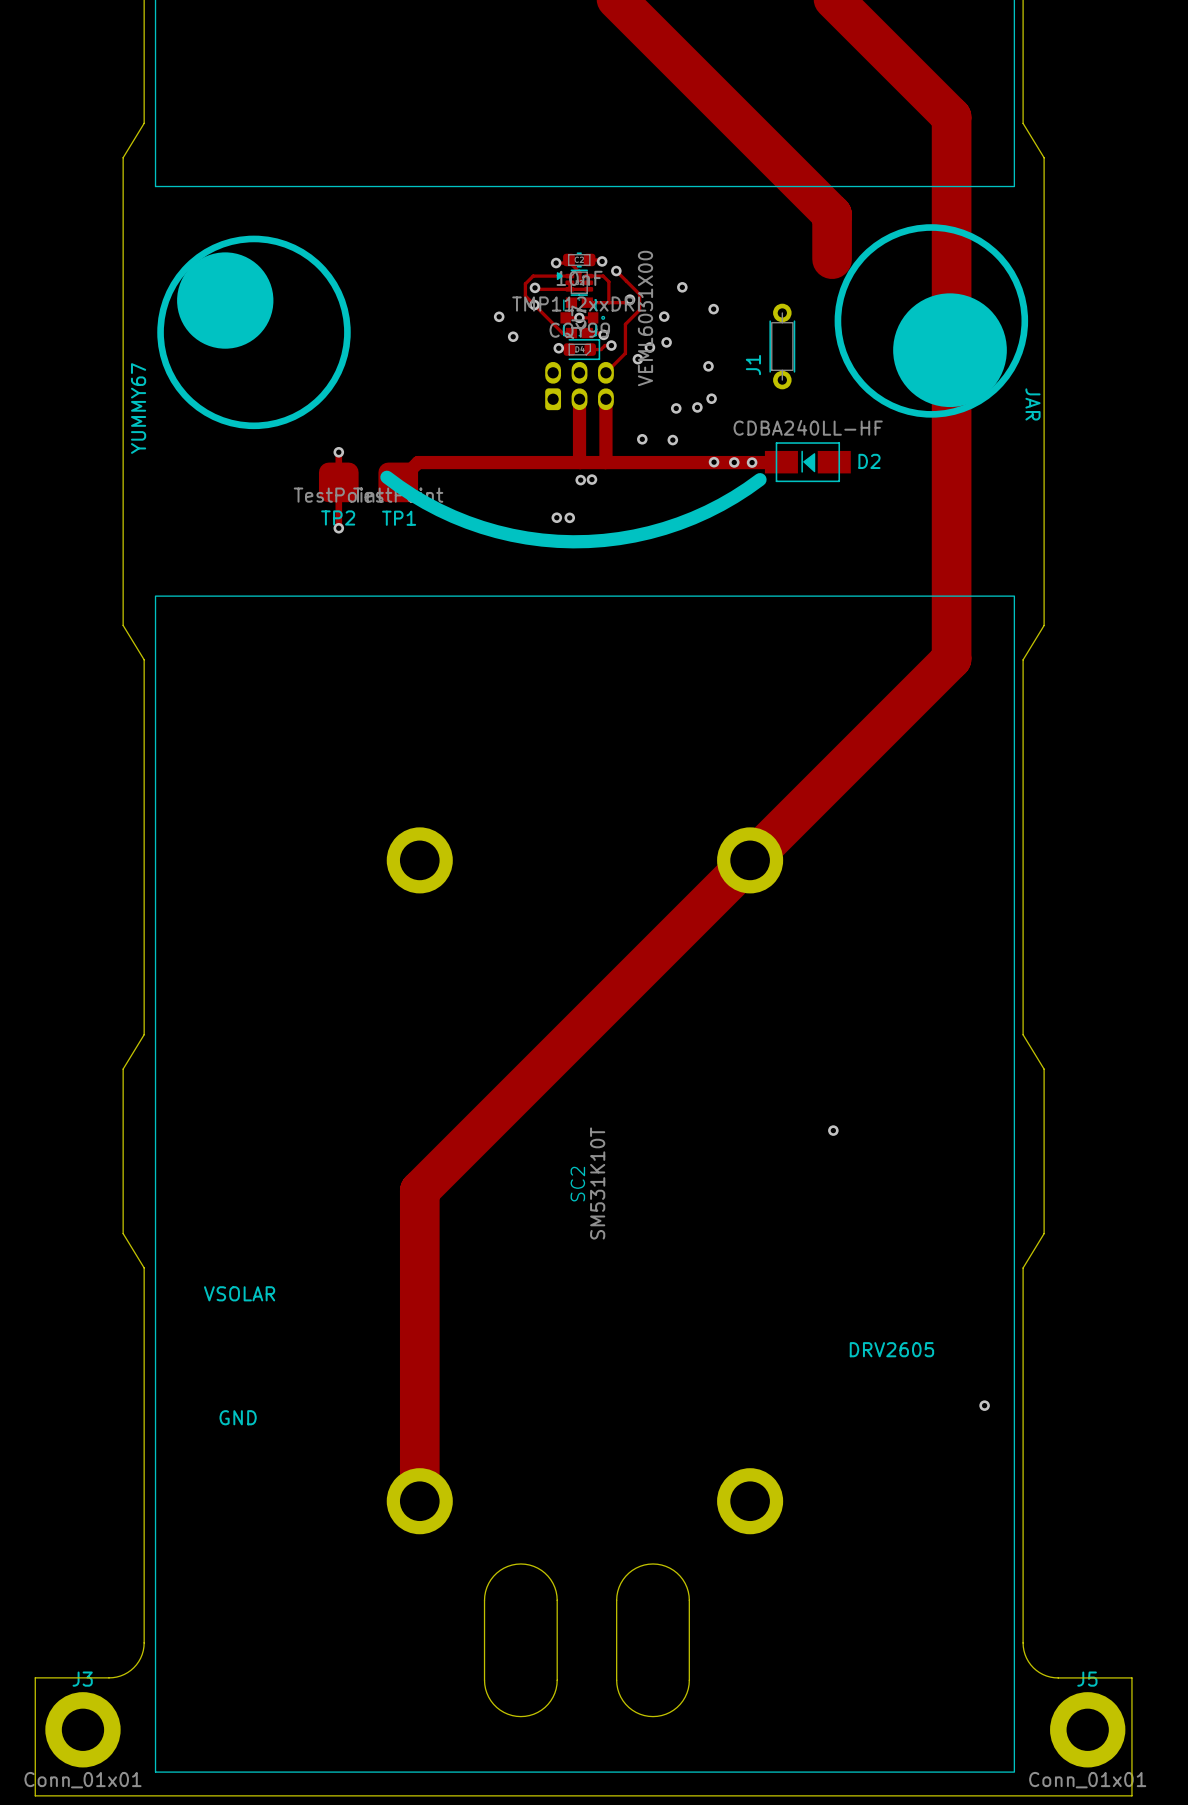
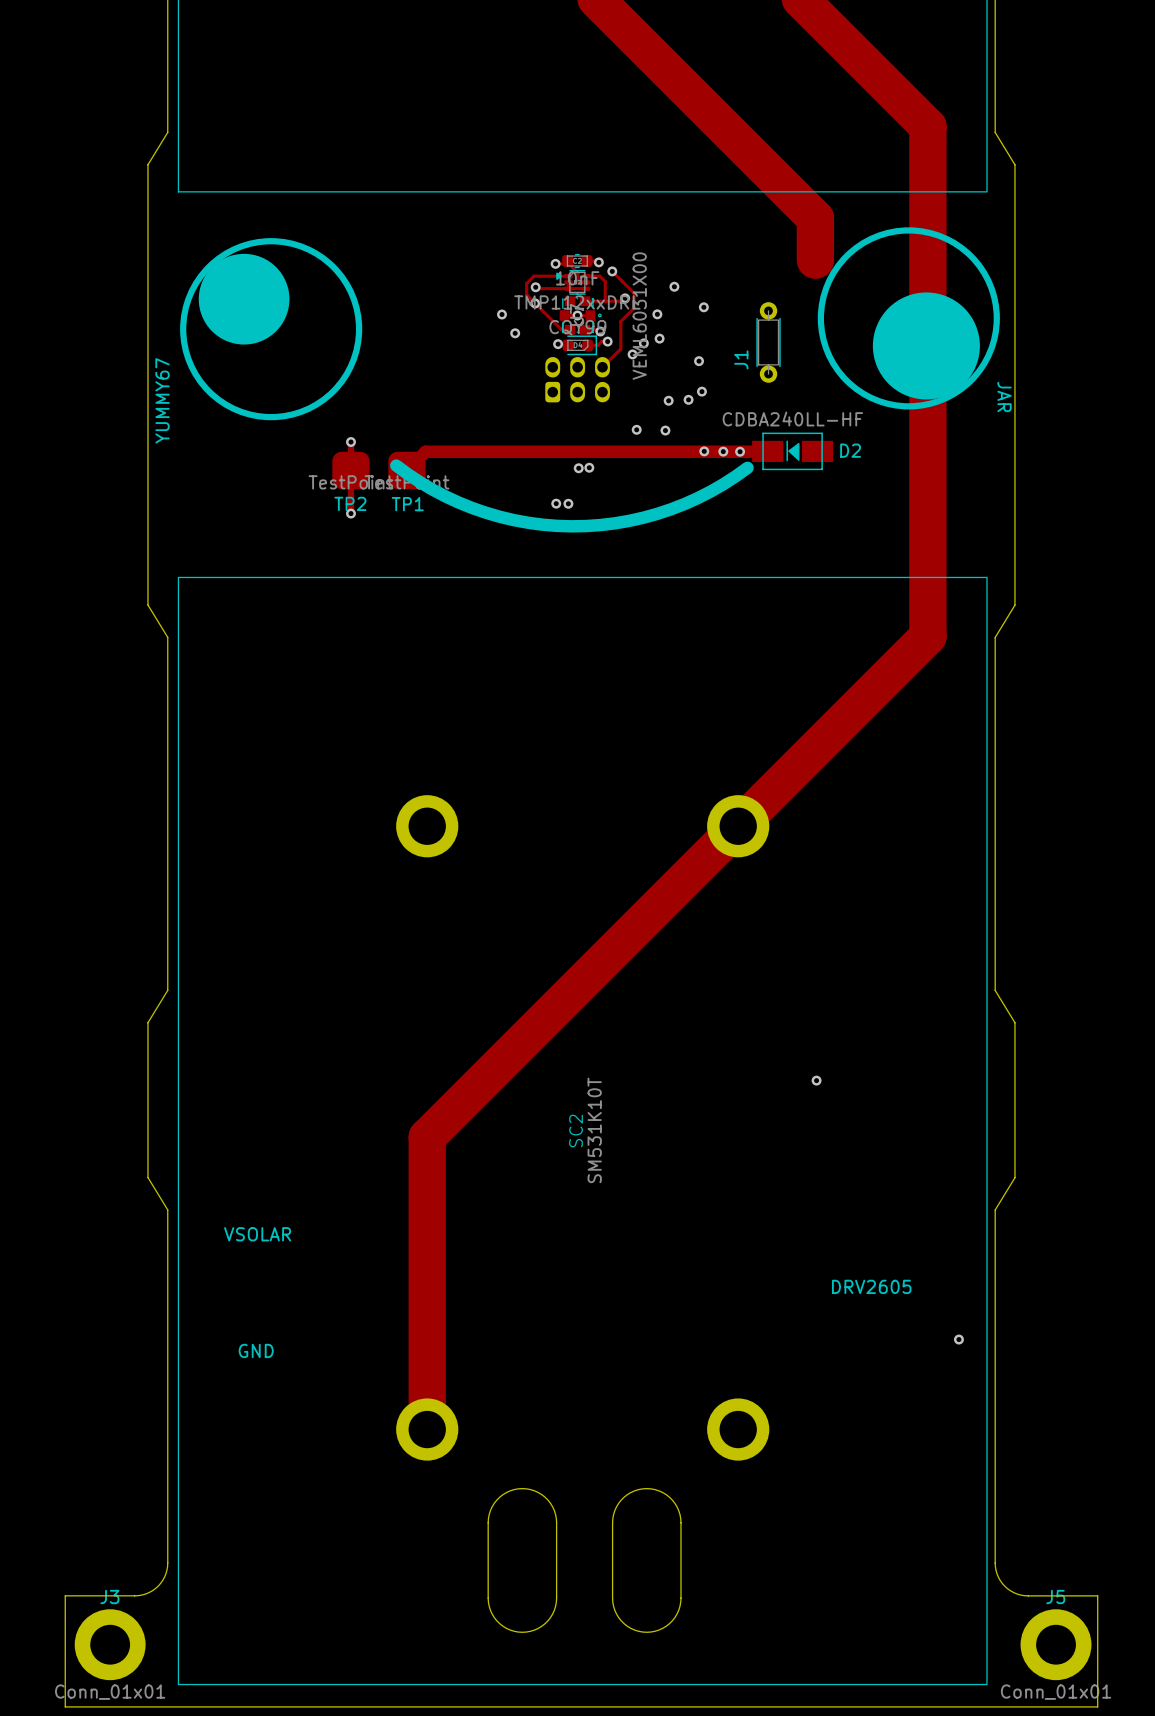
track: (579, 399) (580, 462) -> none
track: (605, 399) (605, 462) -> none

